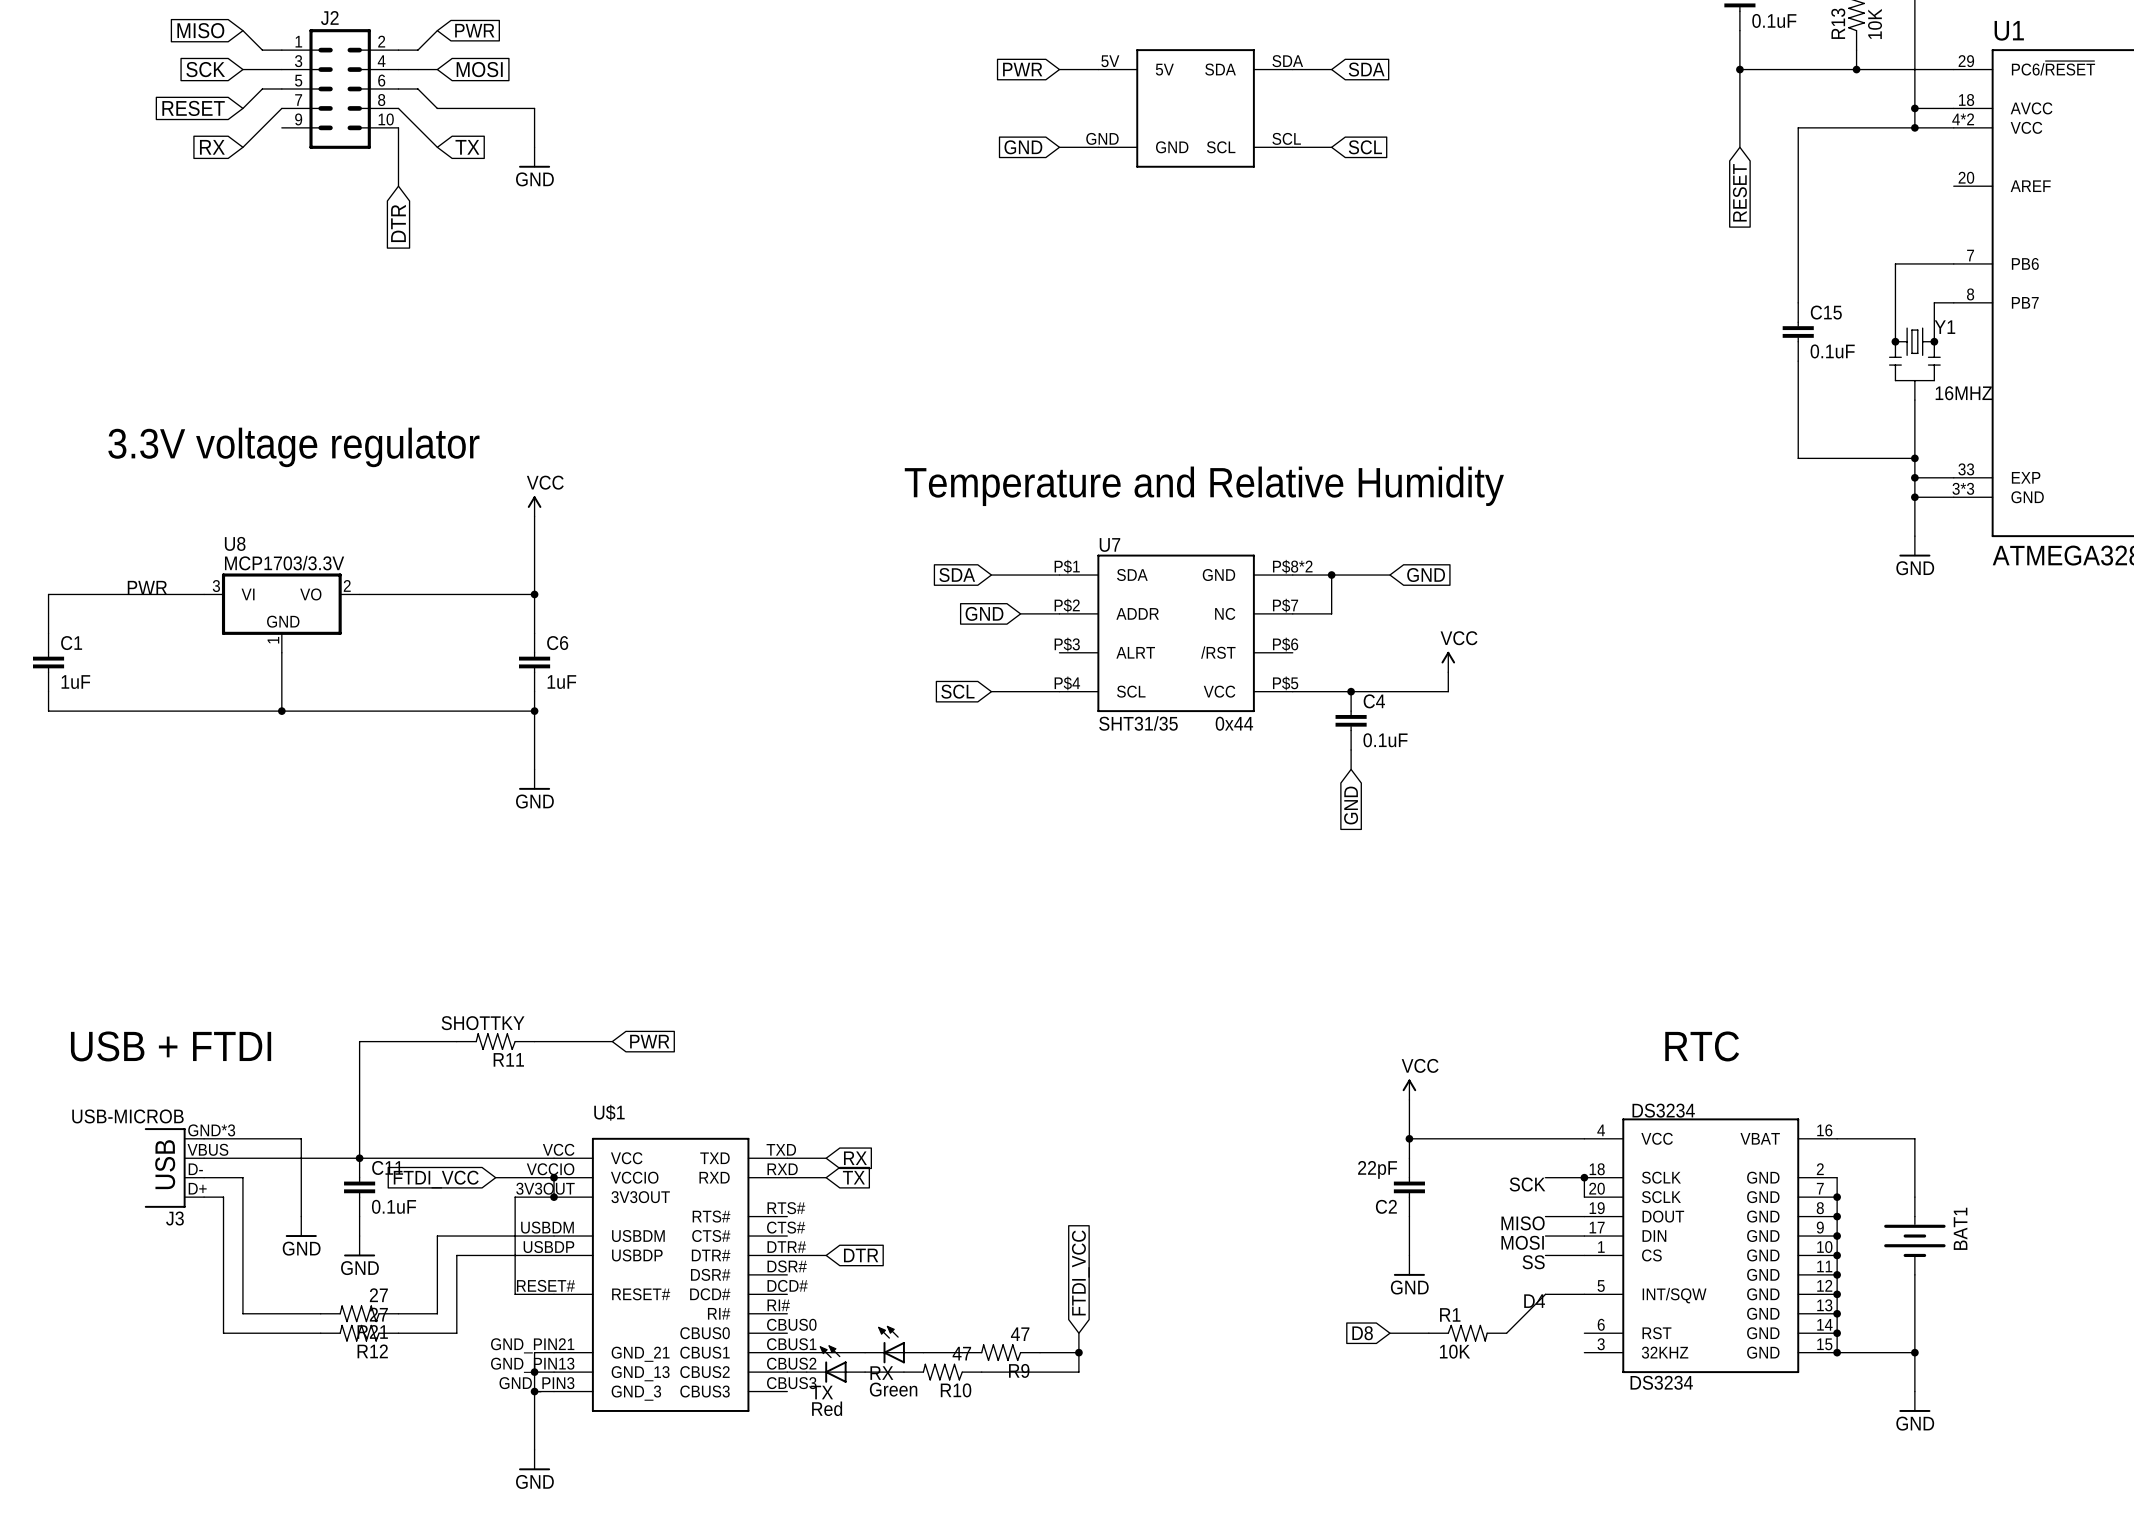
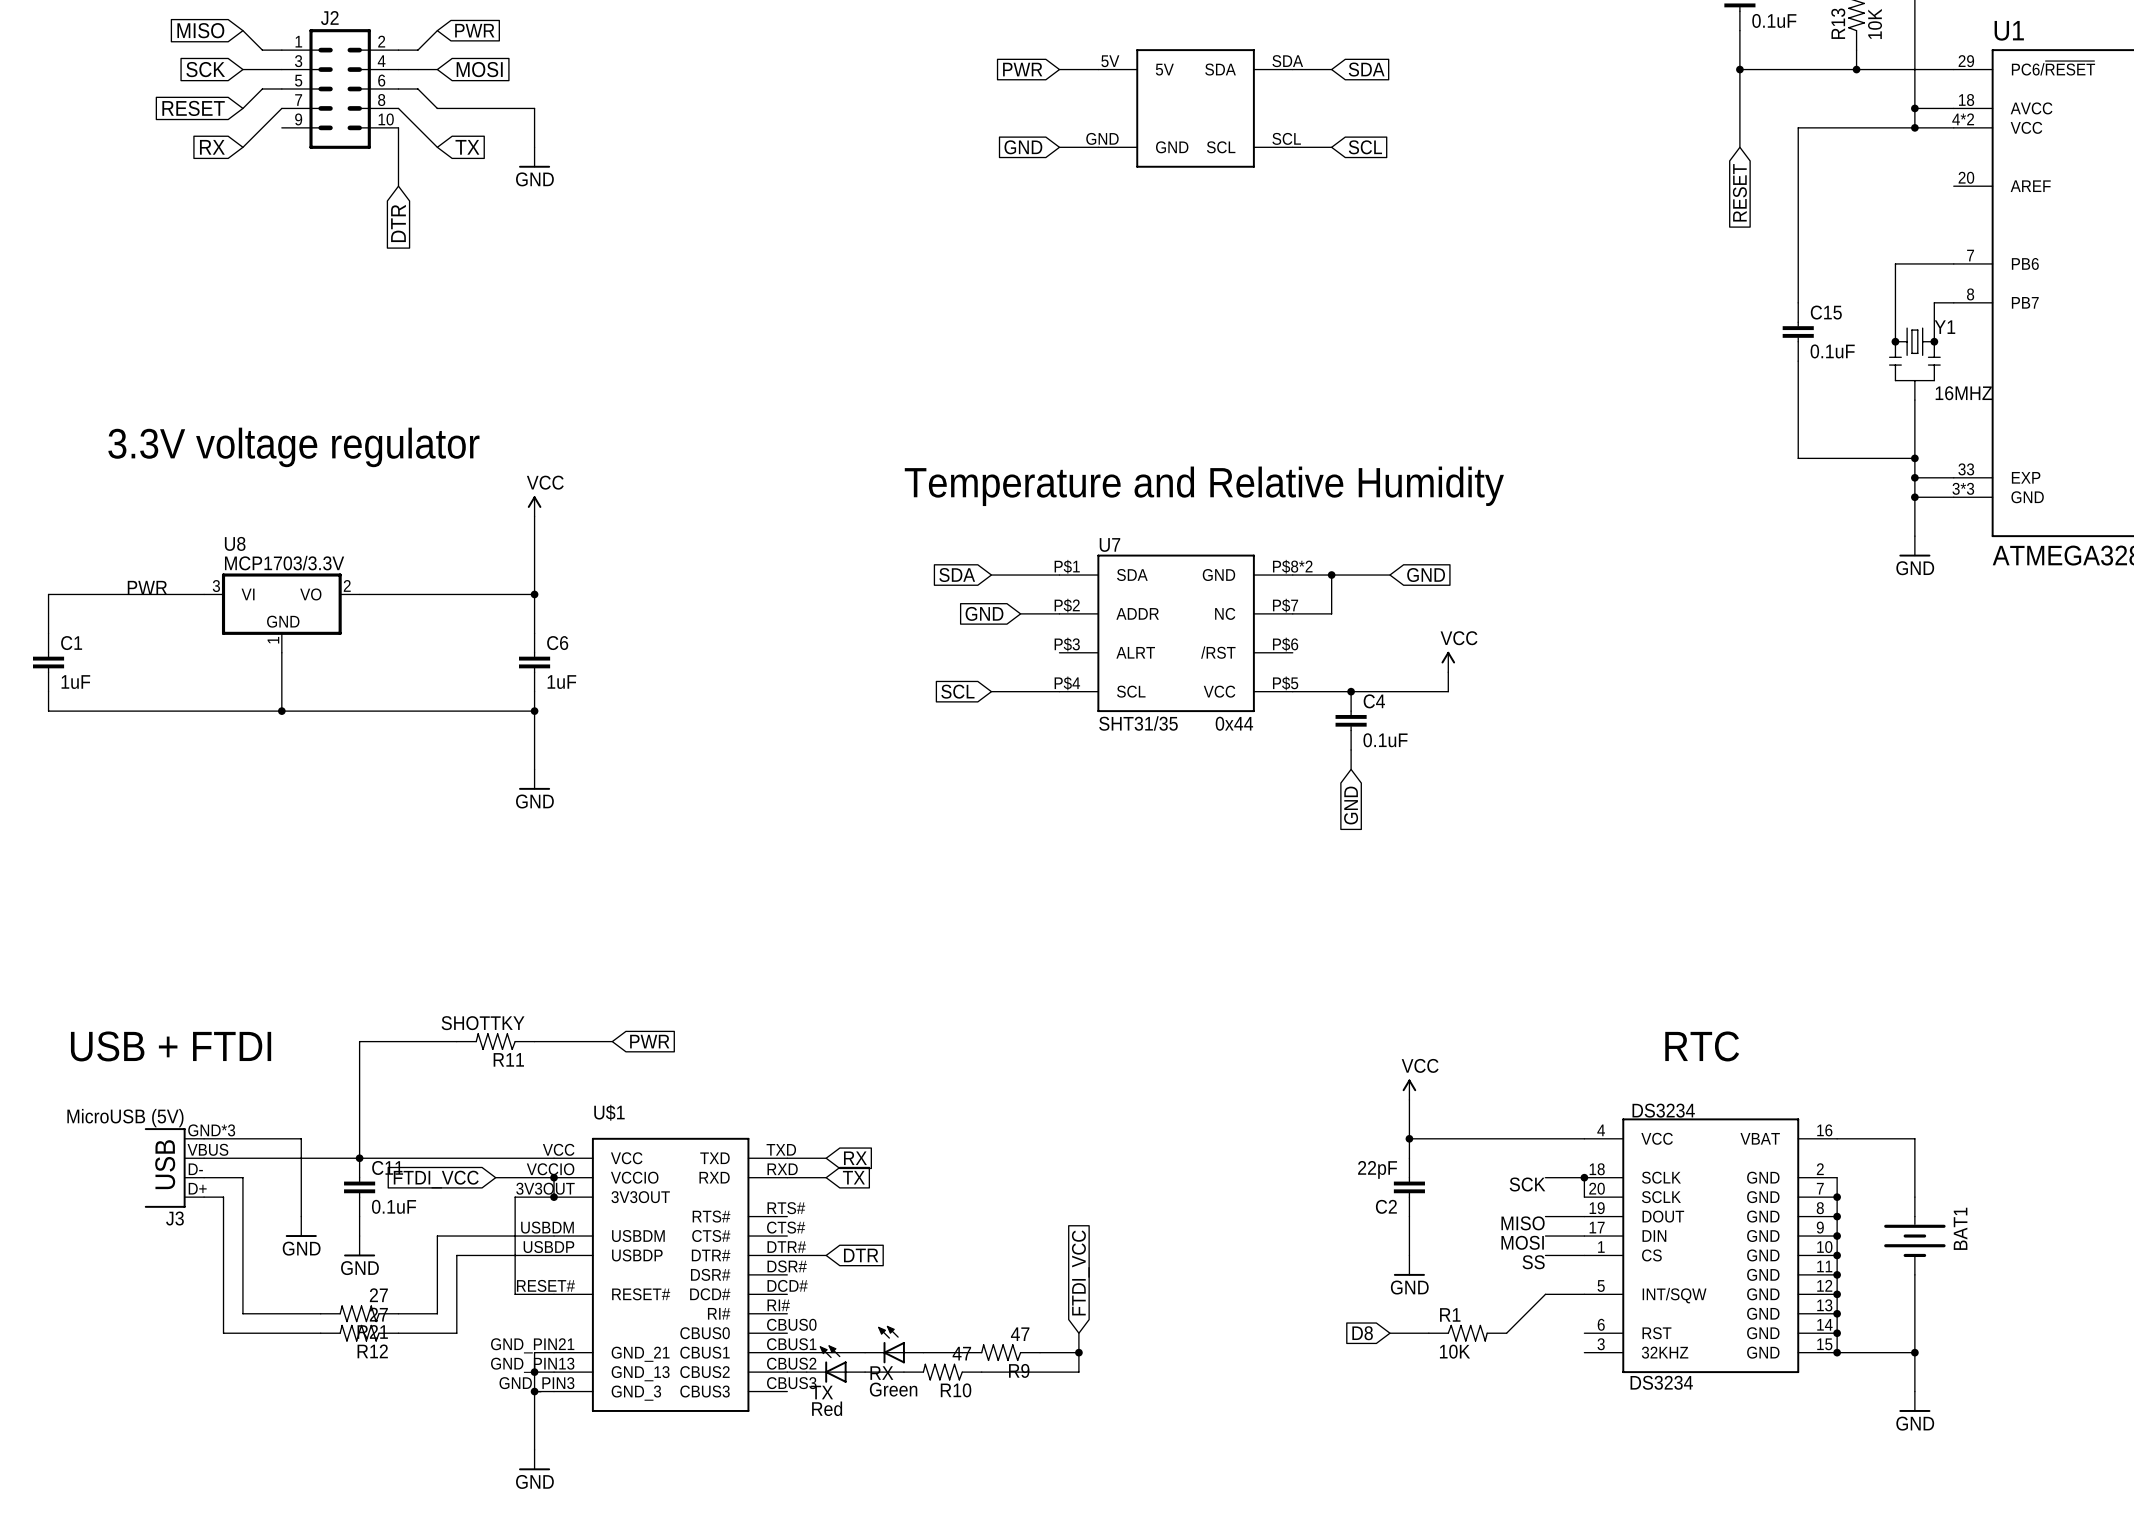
J3 value: USB-MICROB (127, 1116) -> MicroUSB (5V) (125, 1118)
label: D4 (1534, 1301) -> none

